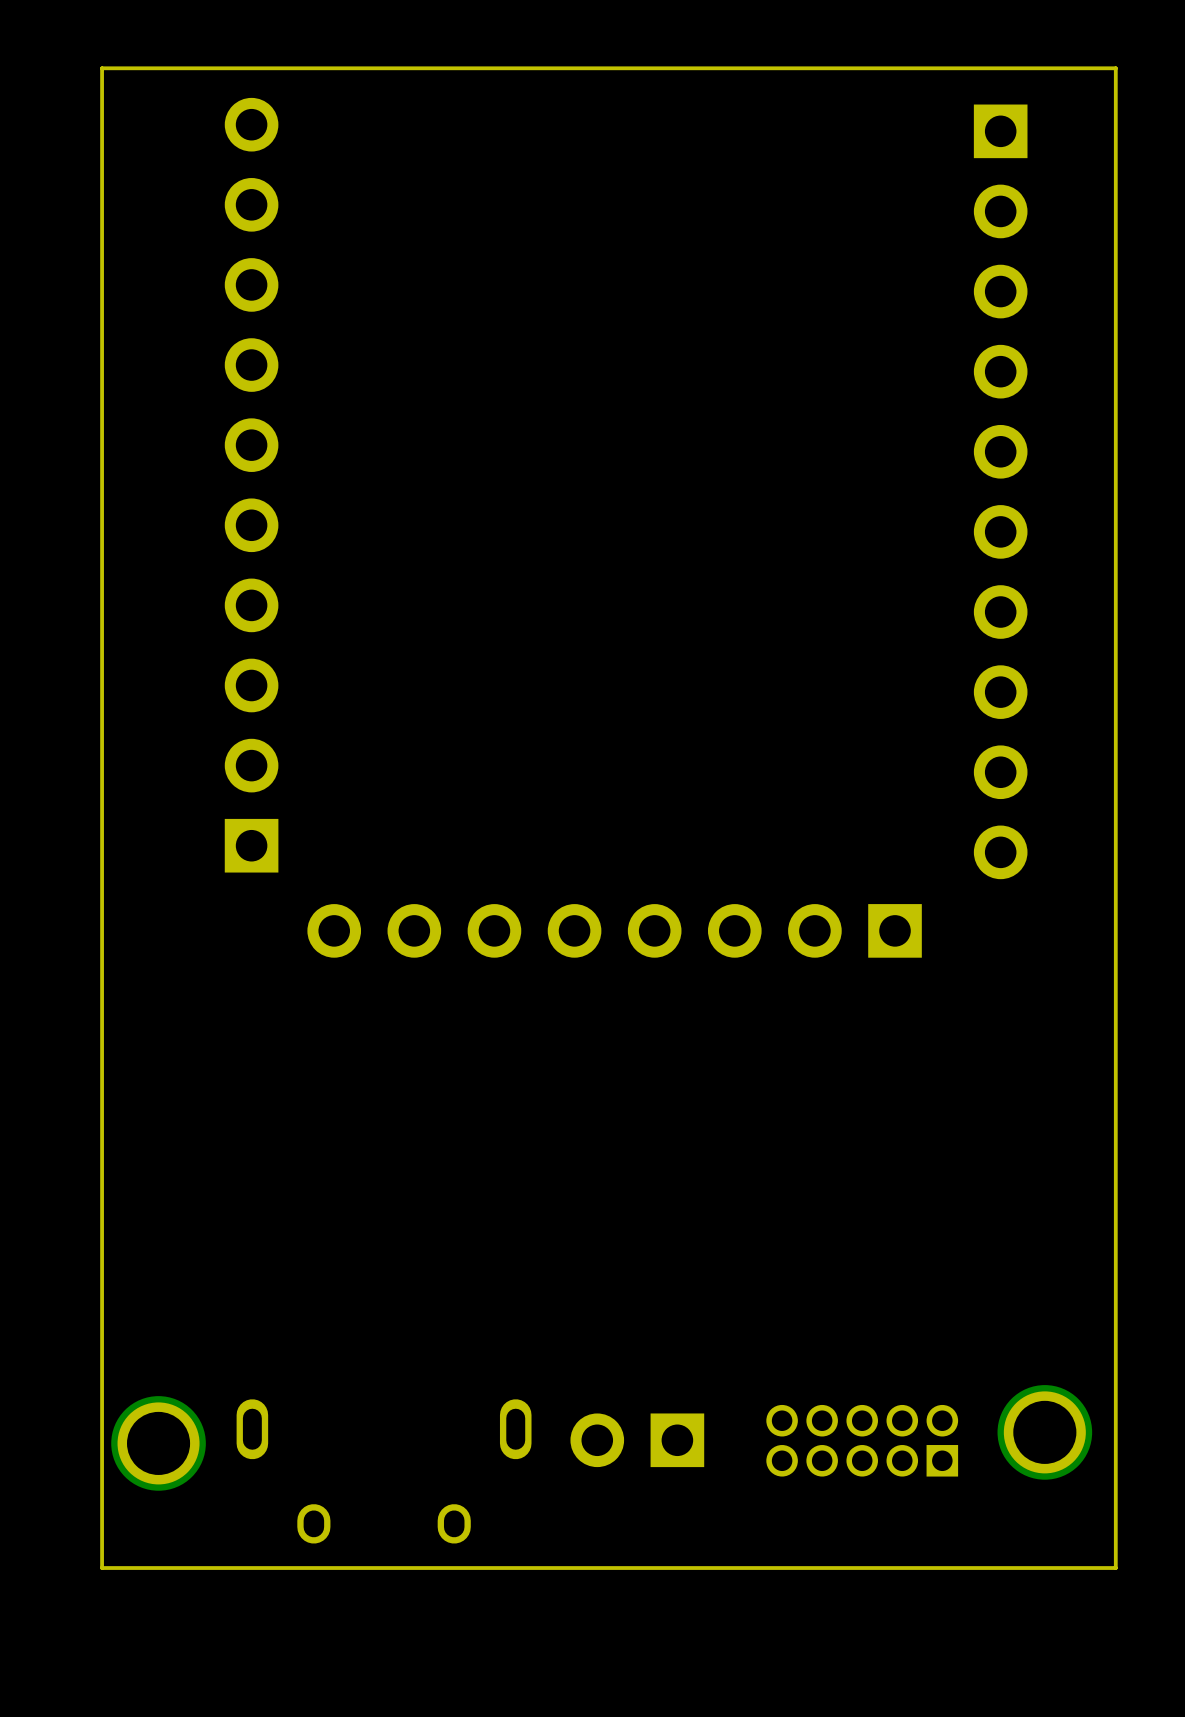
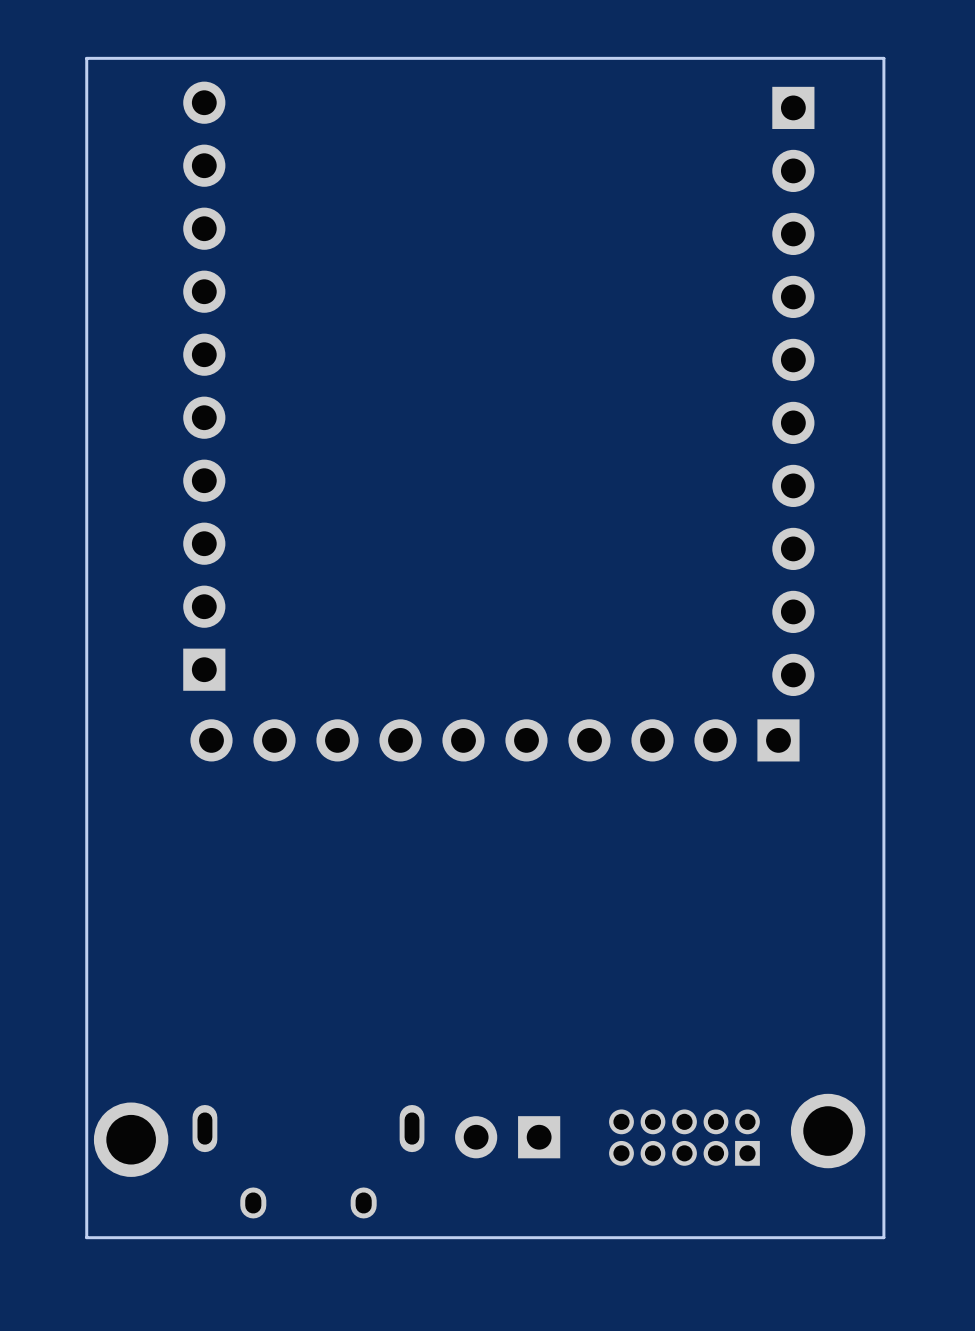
part footprint: [307, 904, 922, 958] -> [190, 719, 800, 762]

